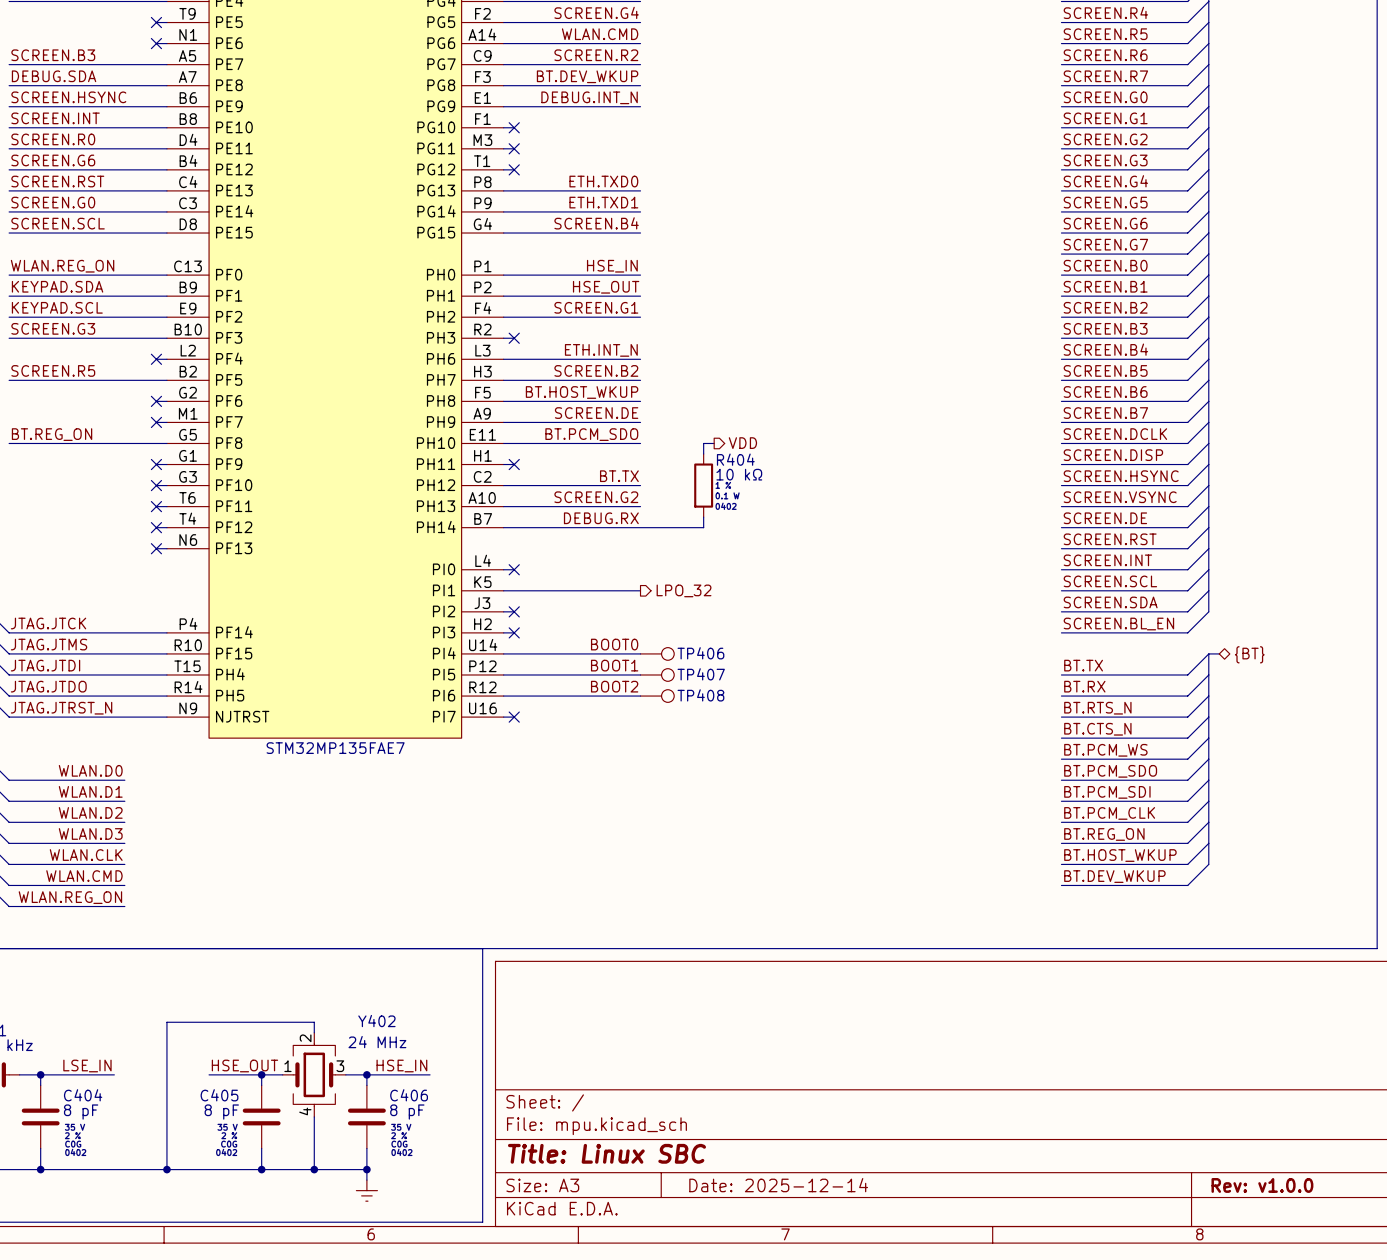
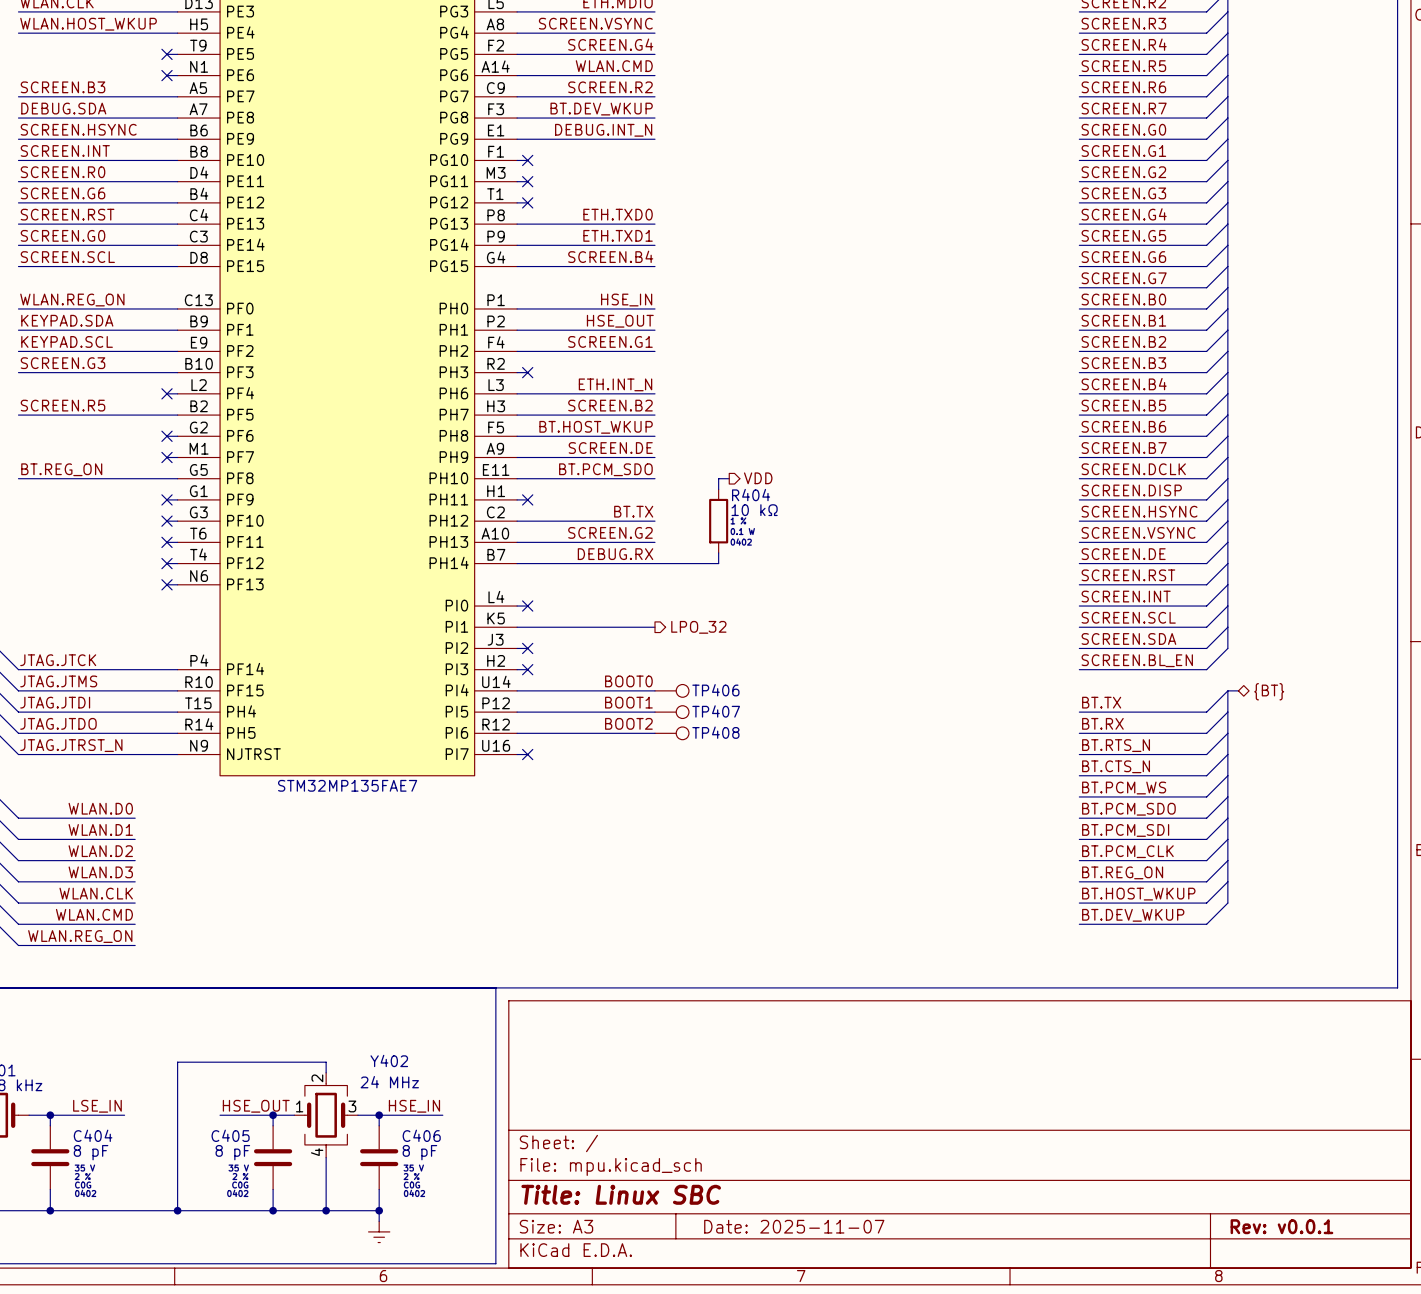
title block: Date: 2025-12-14 (778, 1185) -> Date: 2025-11-07 (794, 1226)
title block: Rev: v1.0.0 (1262, 1185) -> Rev: v0.0.1 (1281, 1226)

